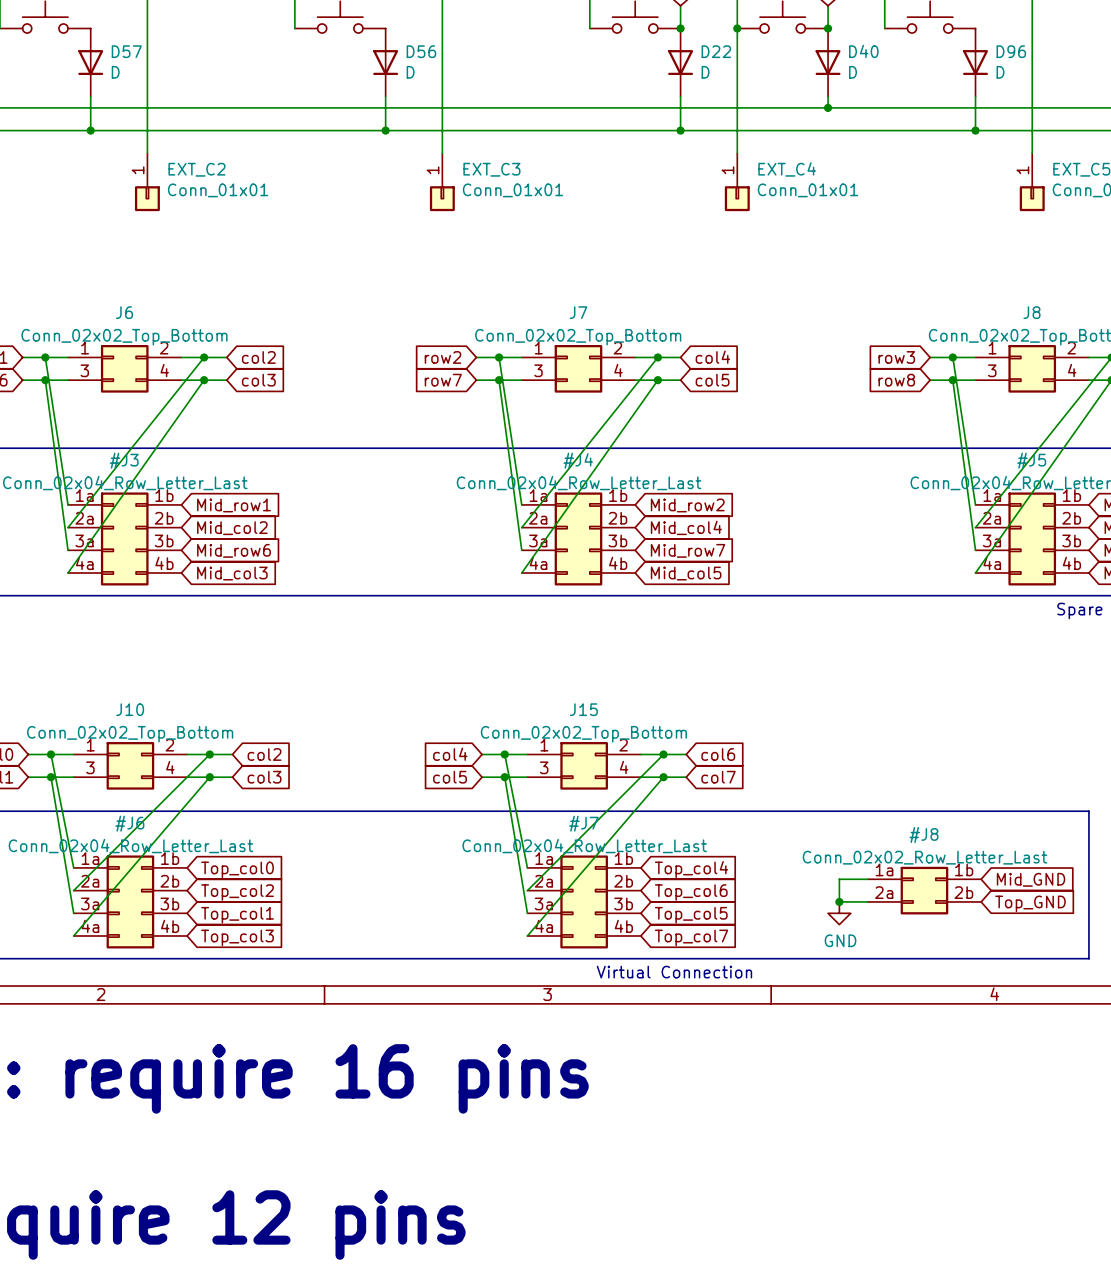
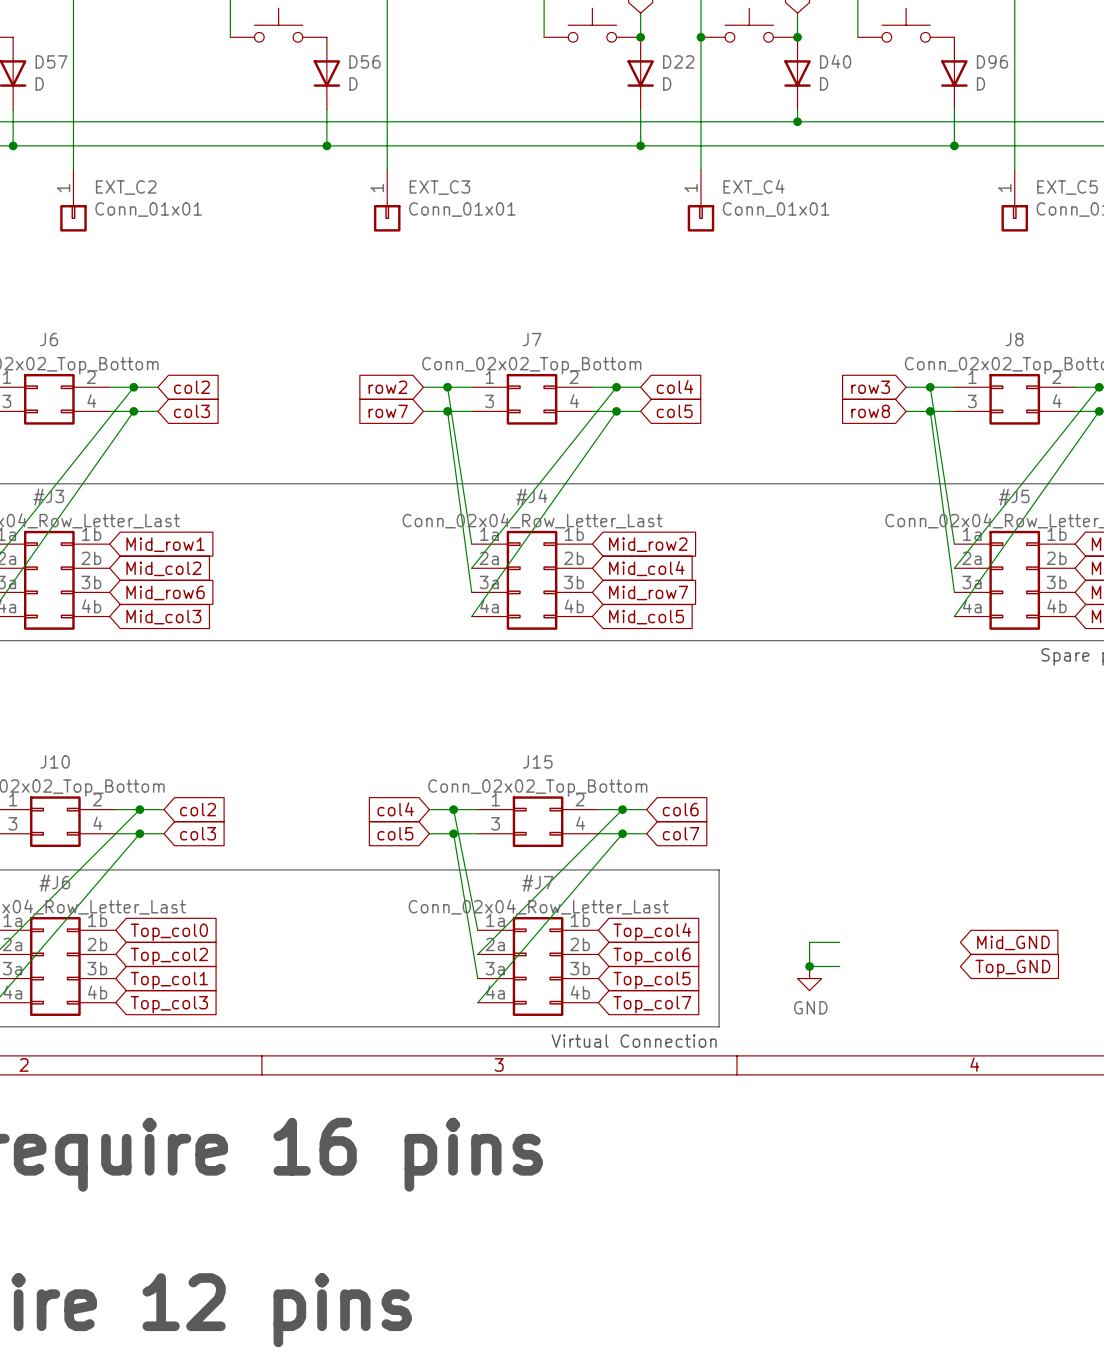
line: (754, 811) (1088, 811) (1088, 958) (754, 958) -> (719, 869) (719, 1026)
#J8: Conn_02x02_Row_Letter_Last (924, 890) -> none

